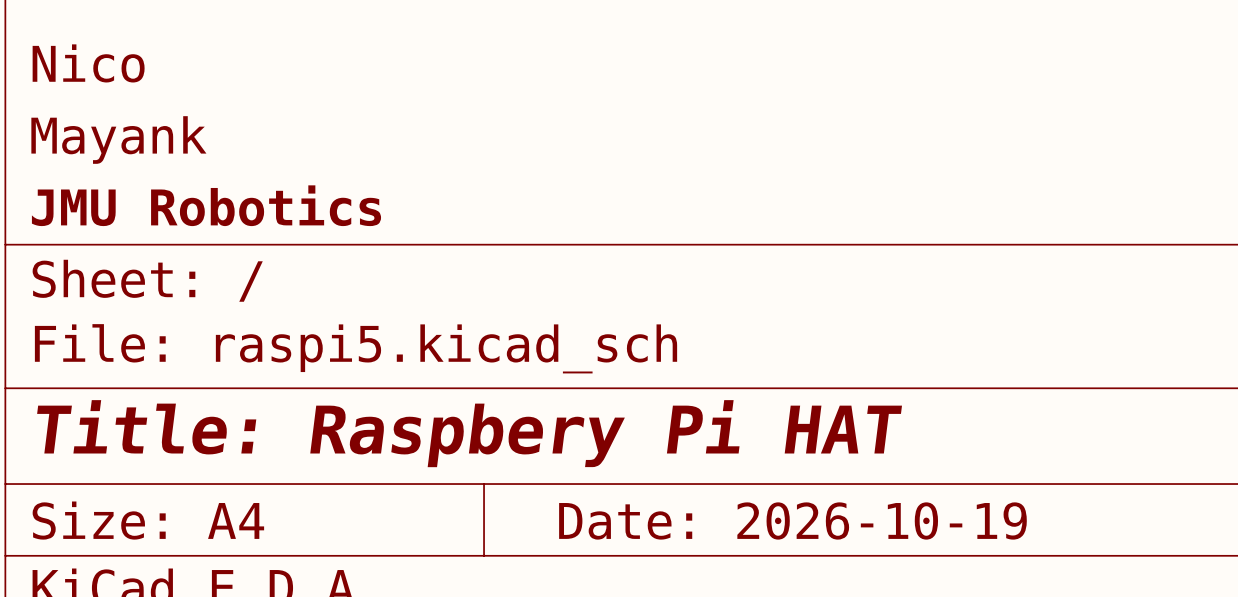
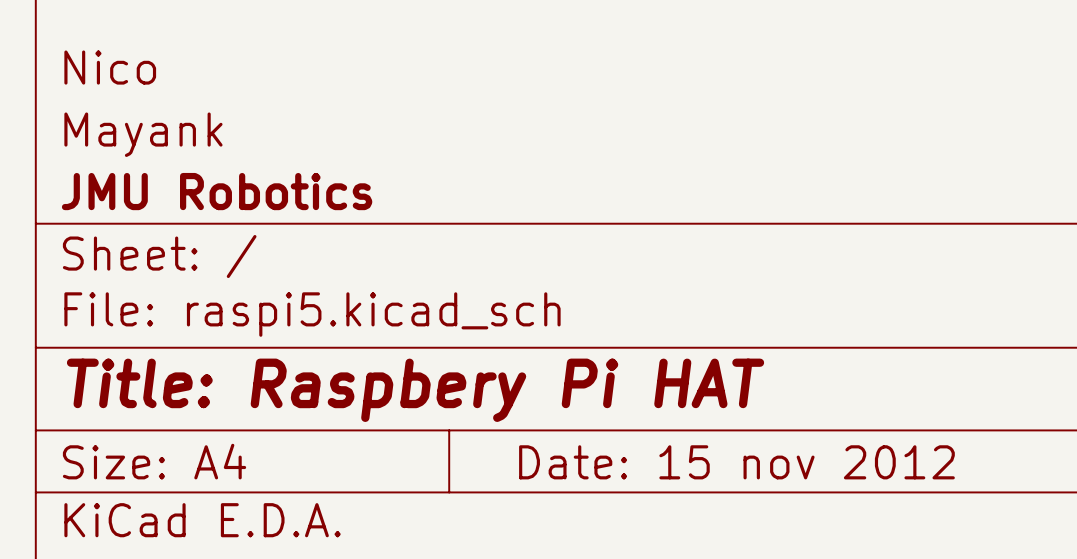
title block: Date: 2026-10-19 (792, 520) -> Date: 15 nov 2012 (736, 462)

